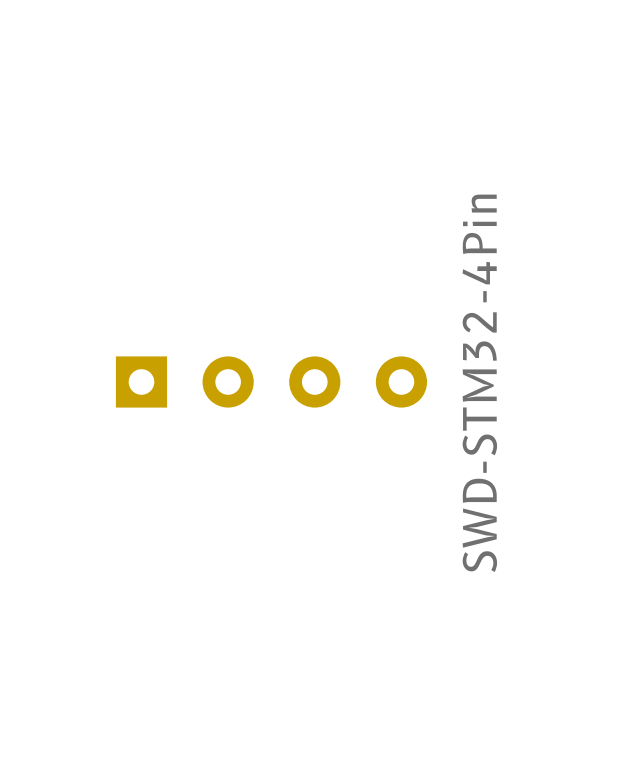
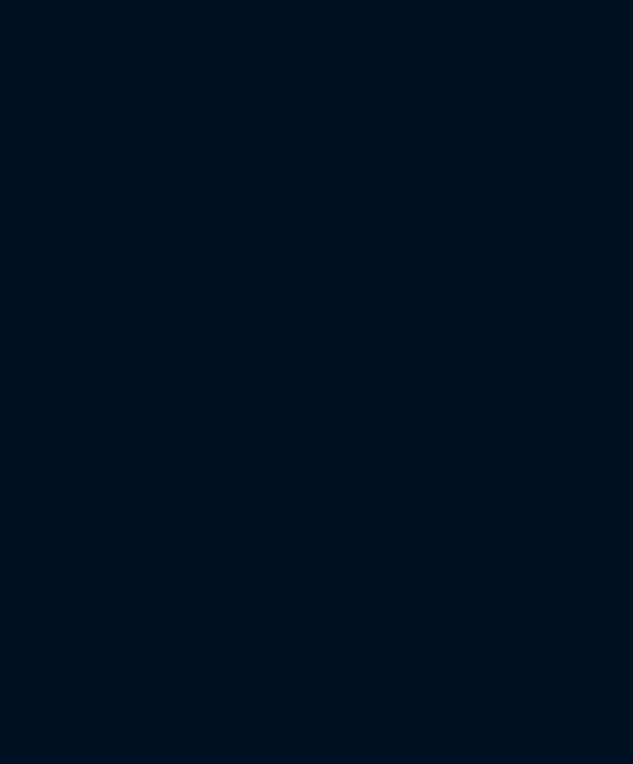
part: SWD-STM32-4Pin (271, 381) -> none

